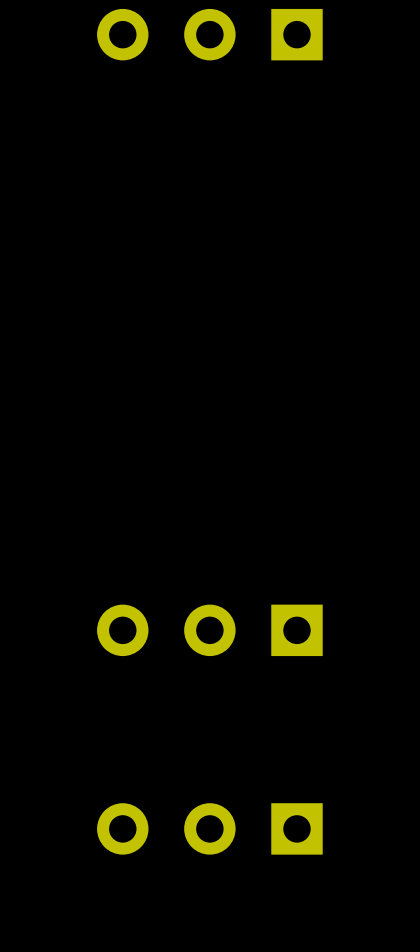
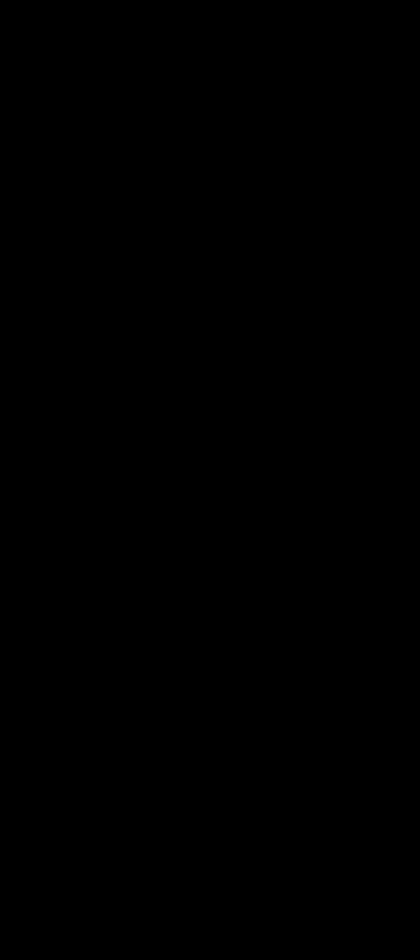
part: (209, 34) -> none
part: (209, 630) -> none
part: (209, 828) -> none

